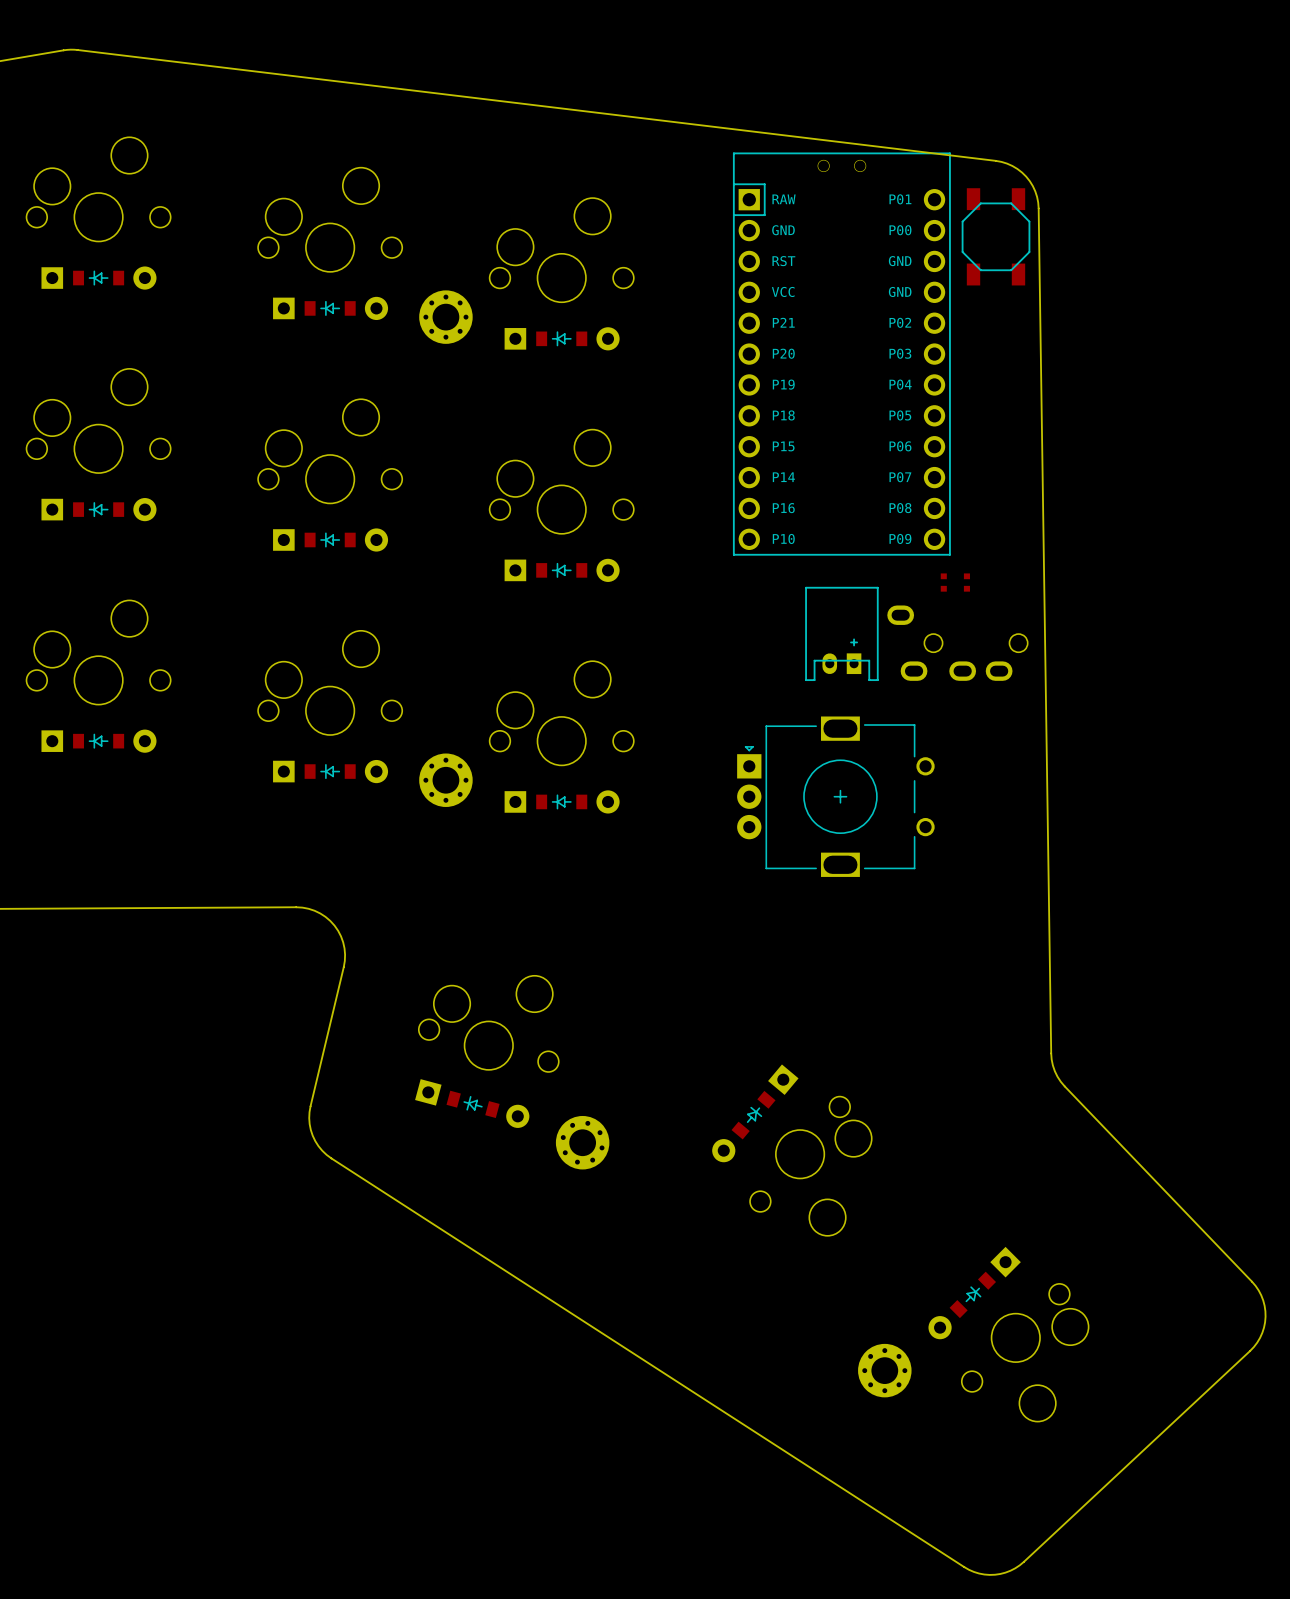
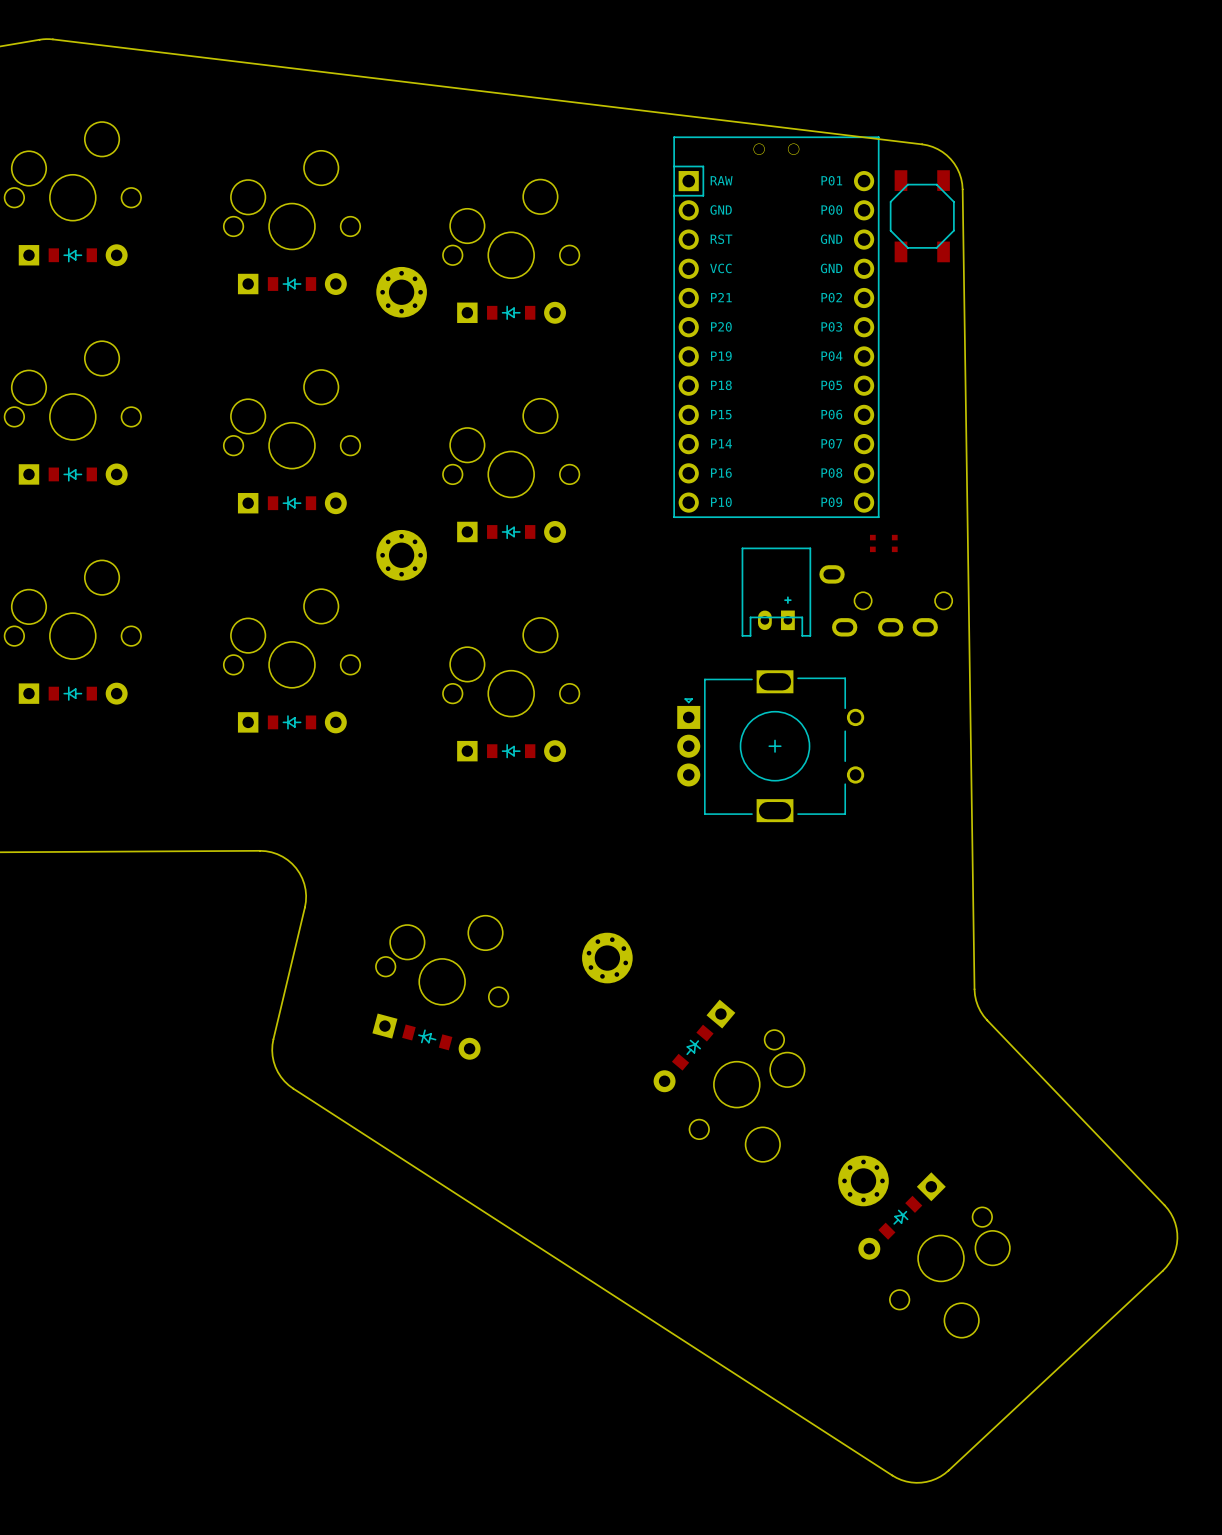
part position: (445, 780) -> (401, 555)
part position: (582, 1142) -> (607, 958)
part position: (884, 1370) -> (863, 1180)

